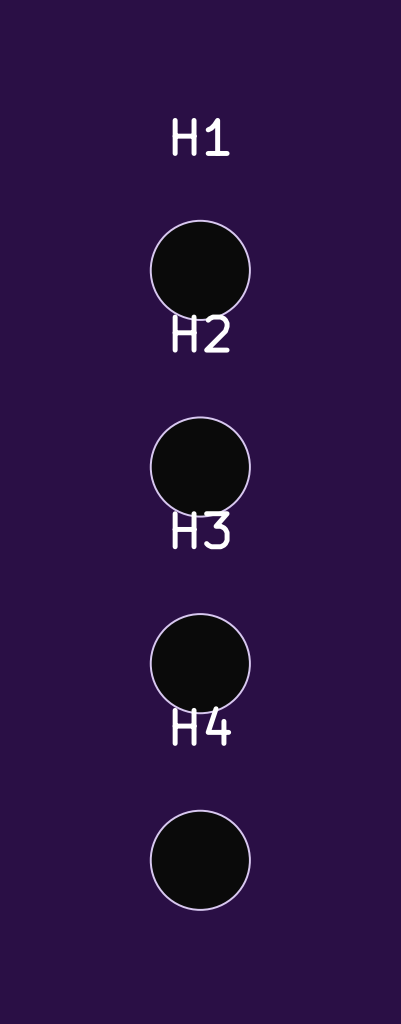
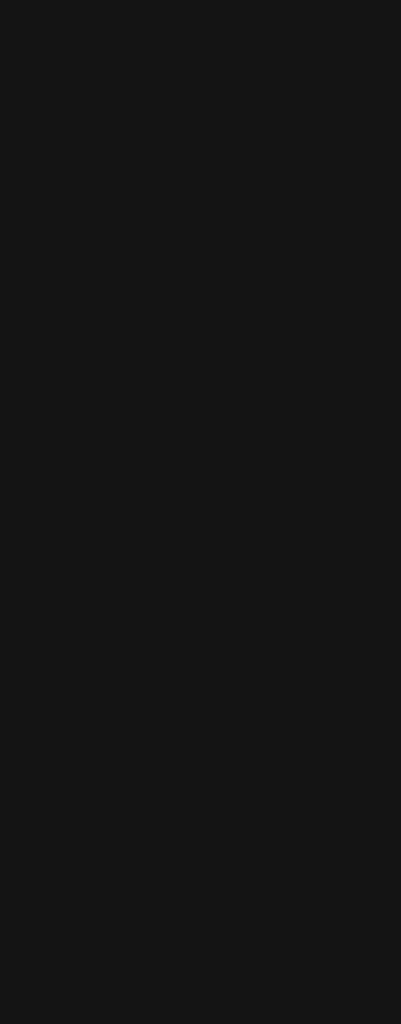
H1: (200, 270) -> none
H2: (200, 467) -> none
H3: (200, 663) -> none
H4: (200, 860) -> none

